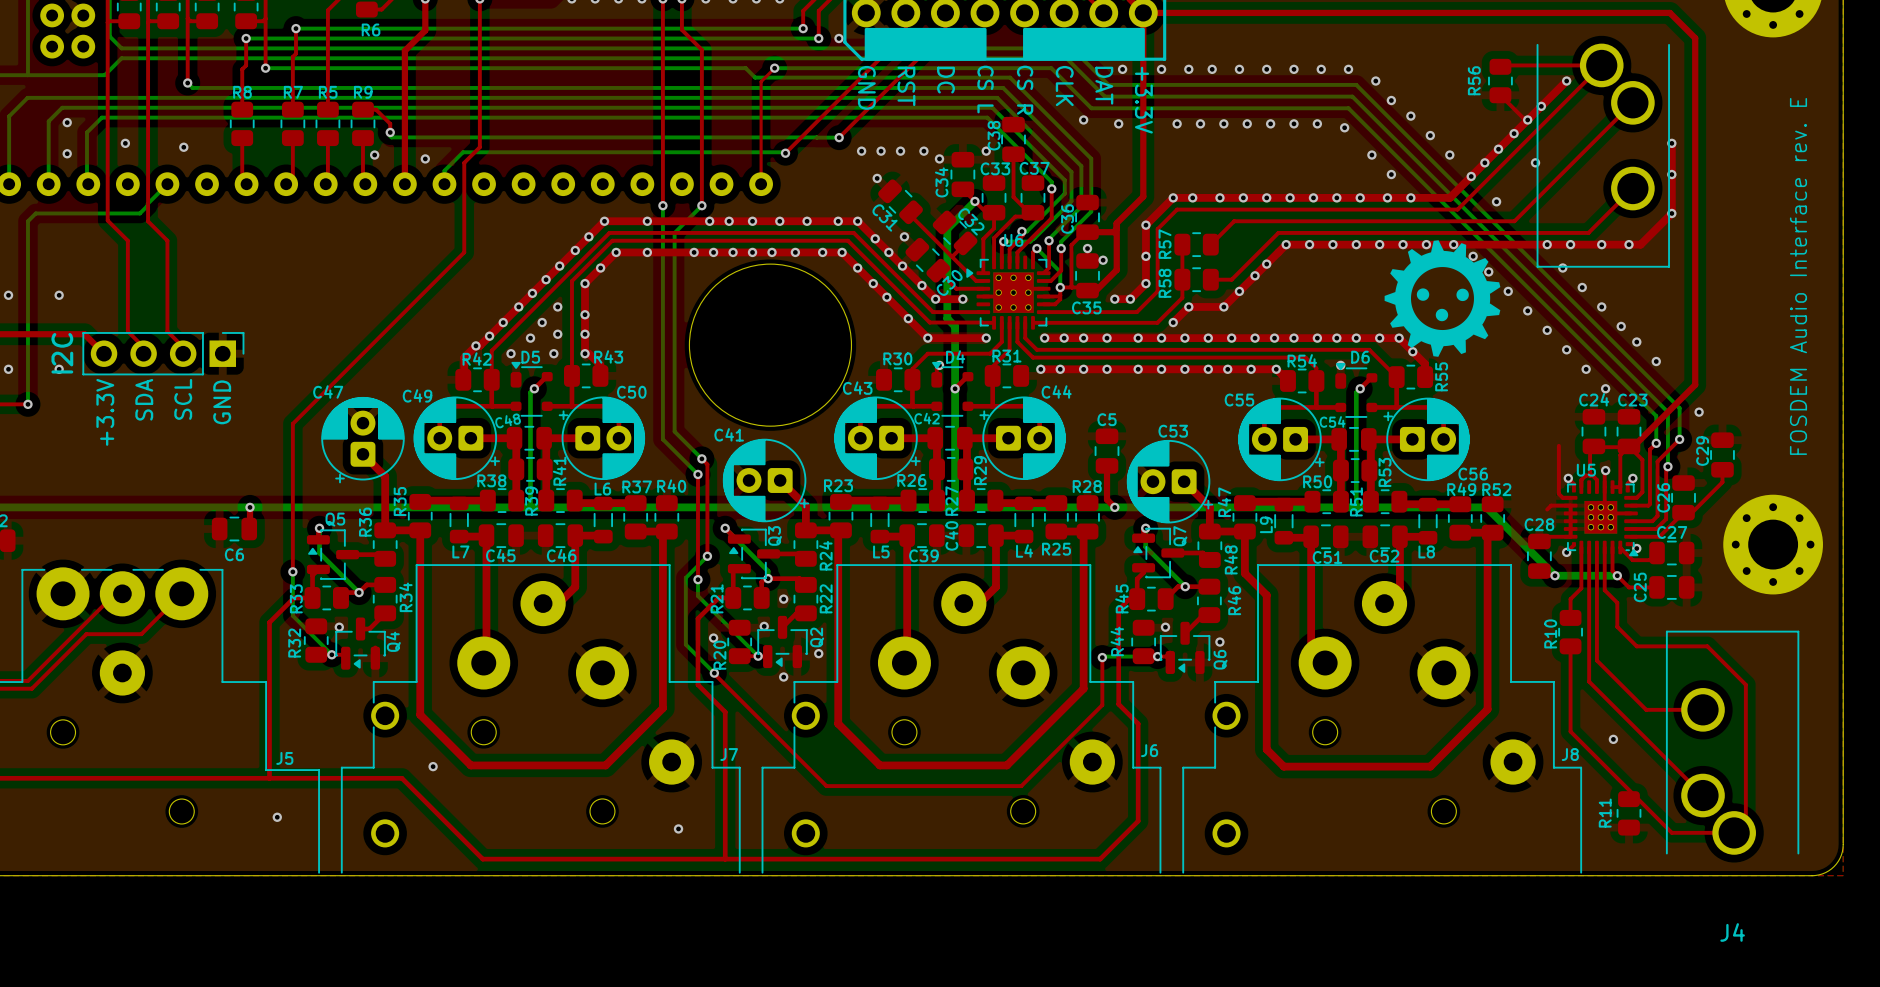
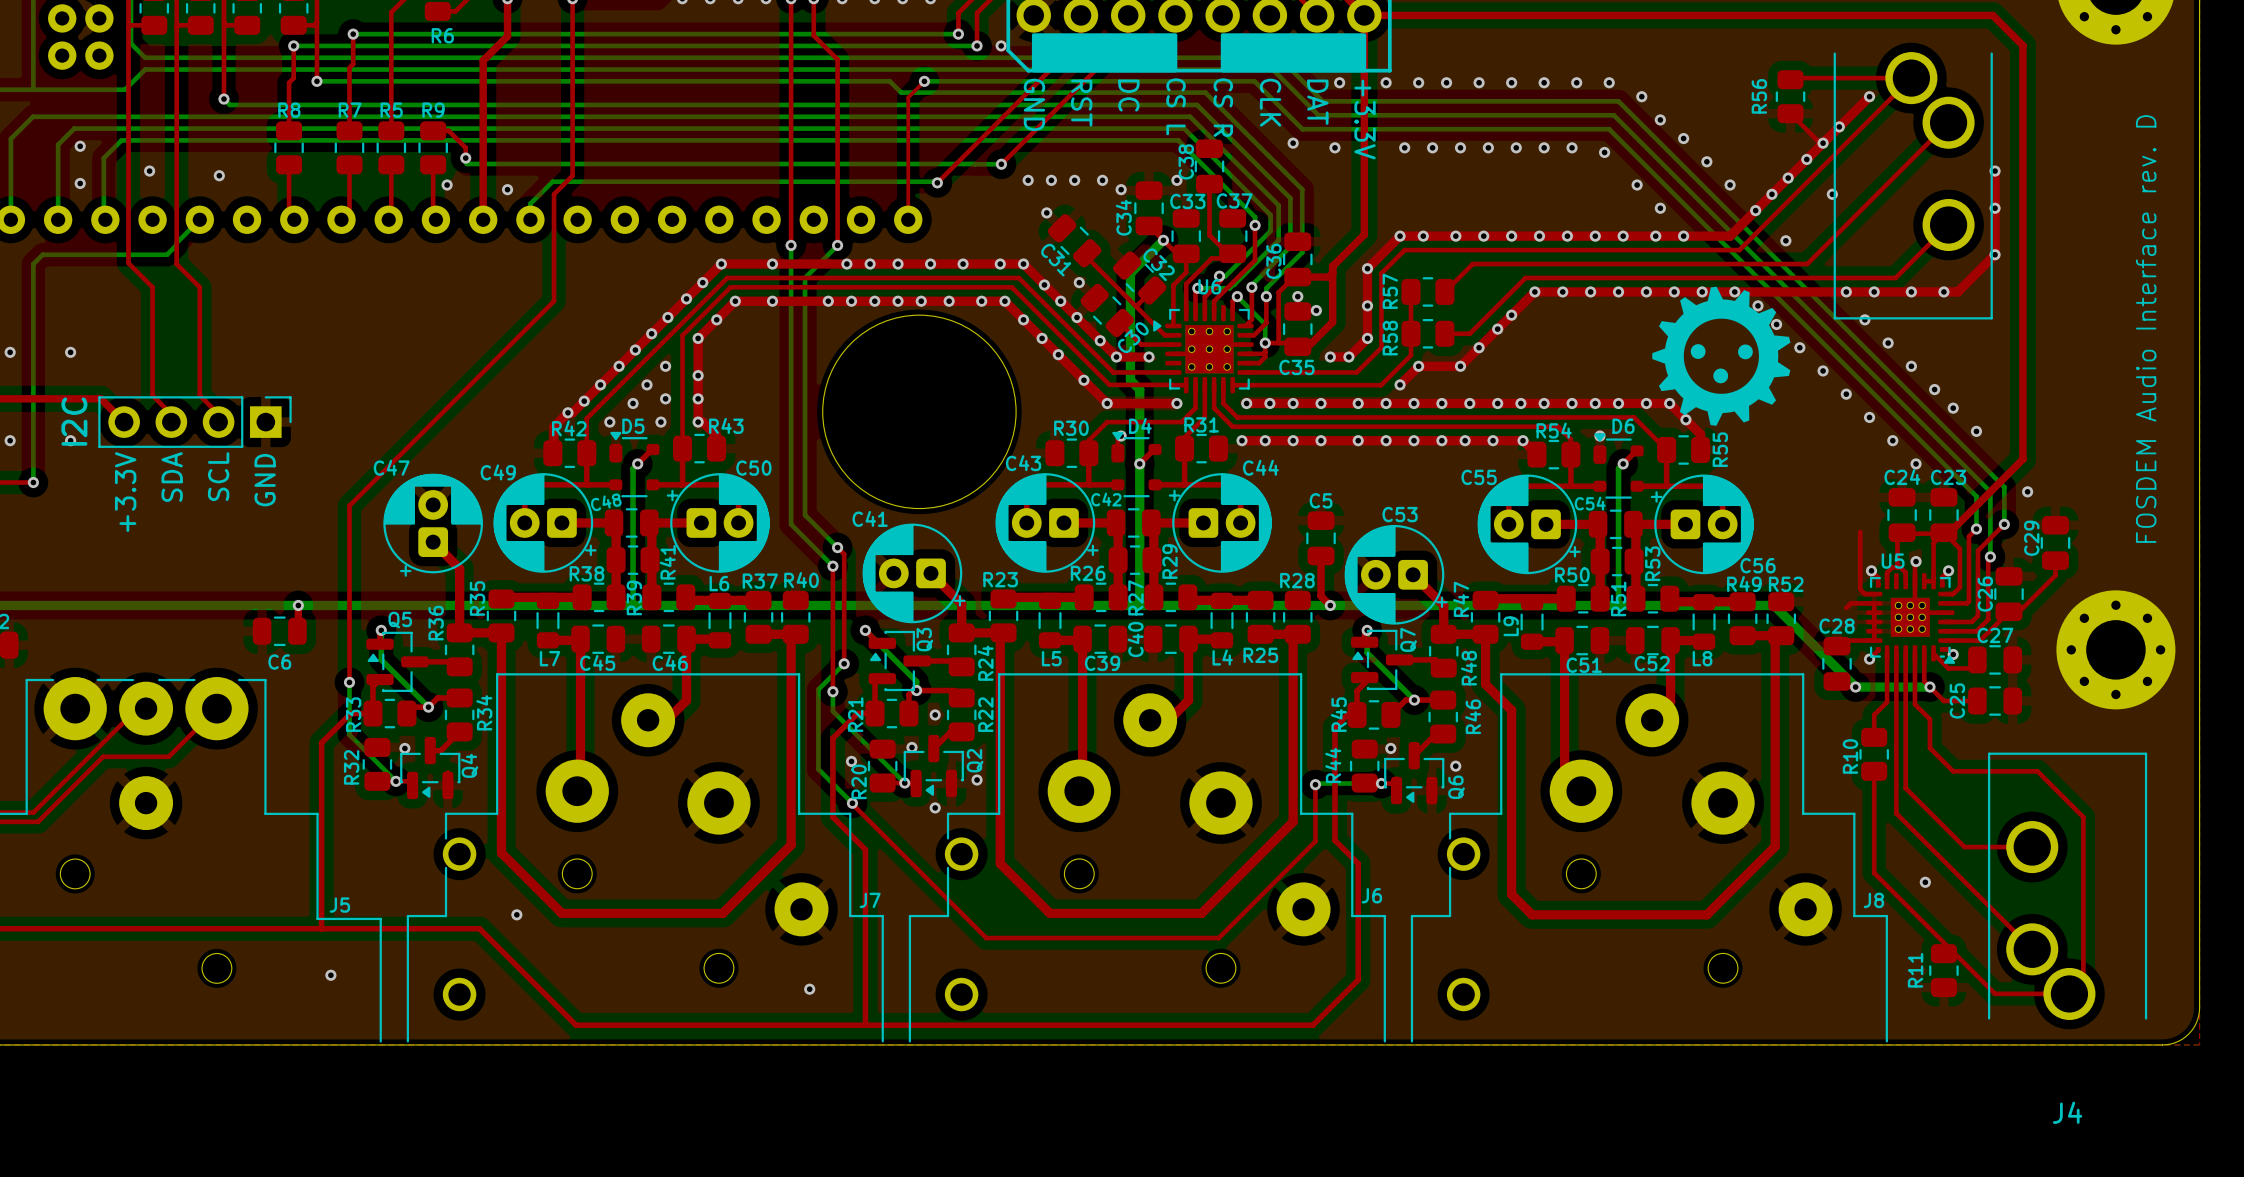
text: FOSDEM Audio Interface rev. E (1798, 276) -> FOSDEM Audio Interface rev. D (2146, 329)

